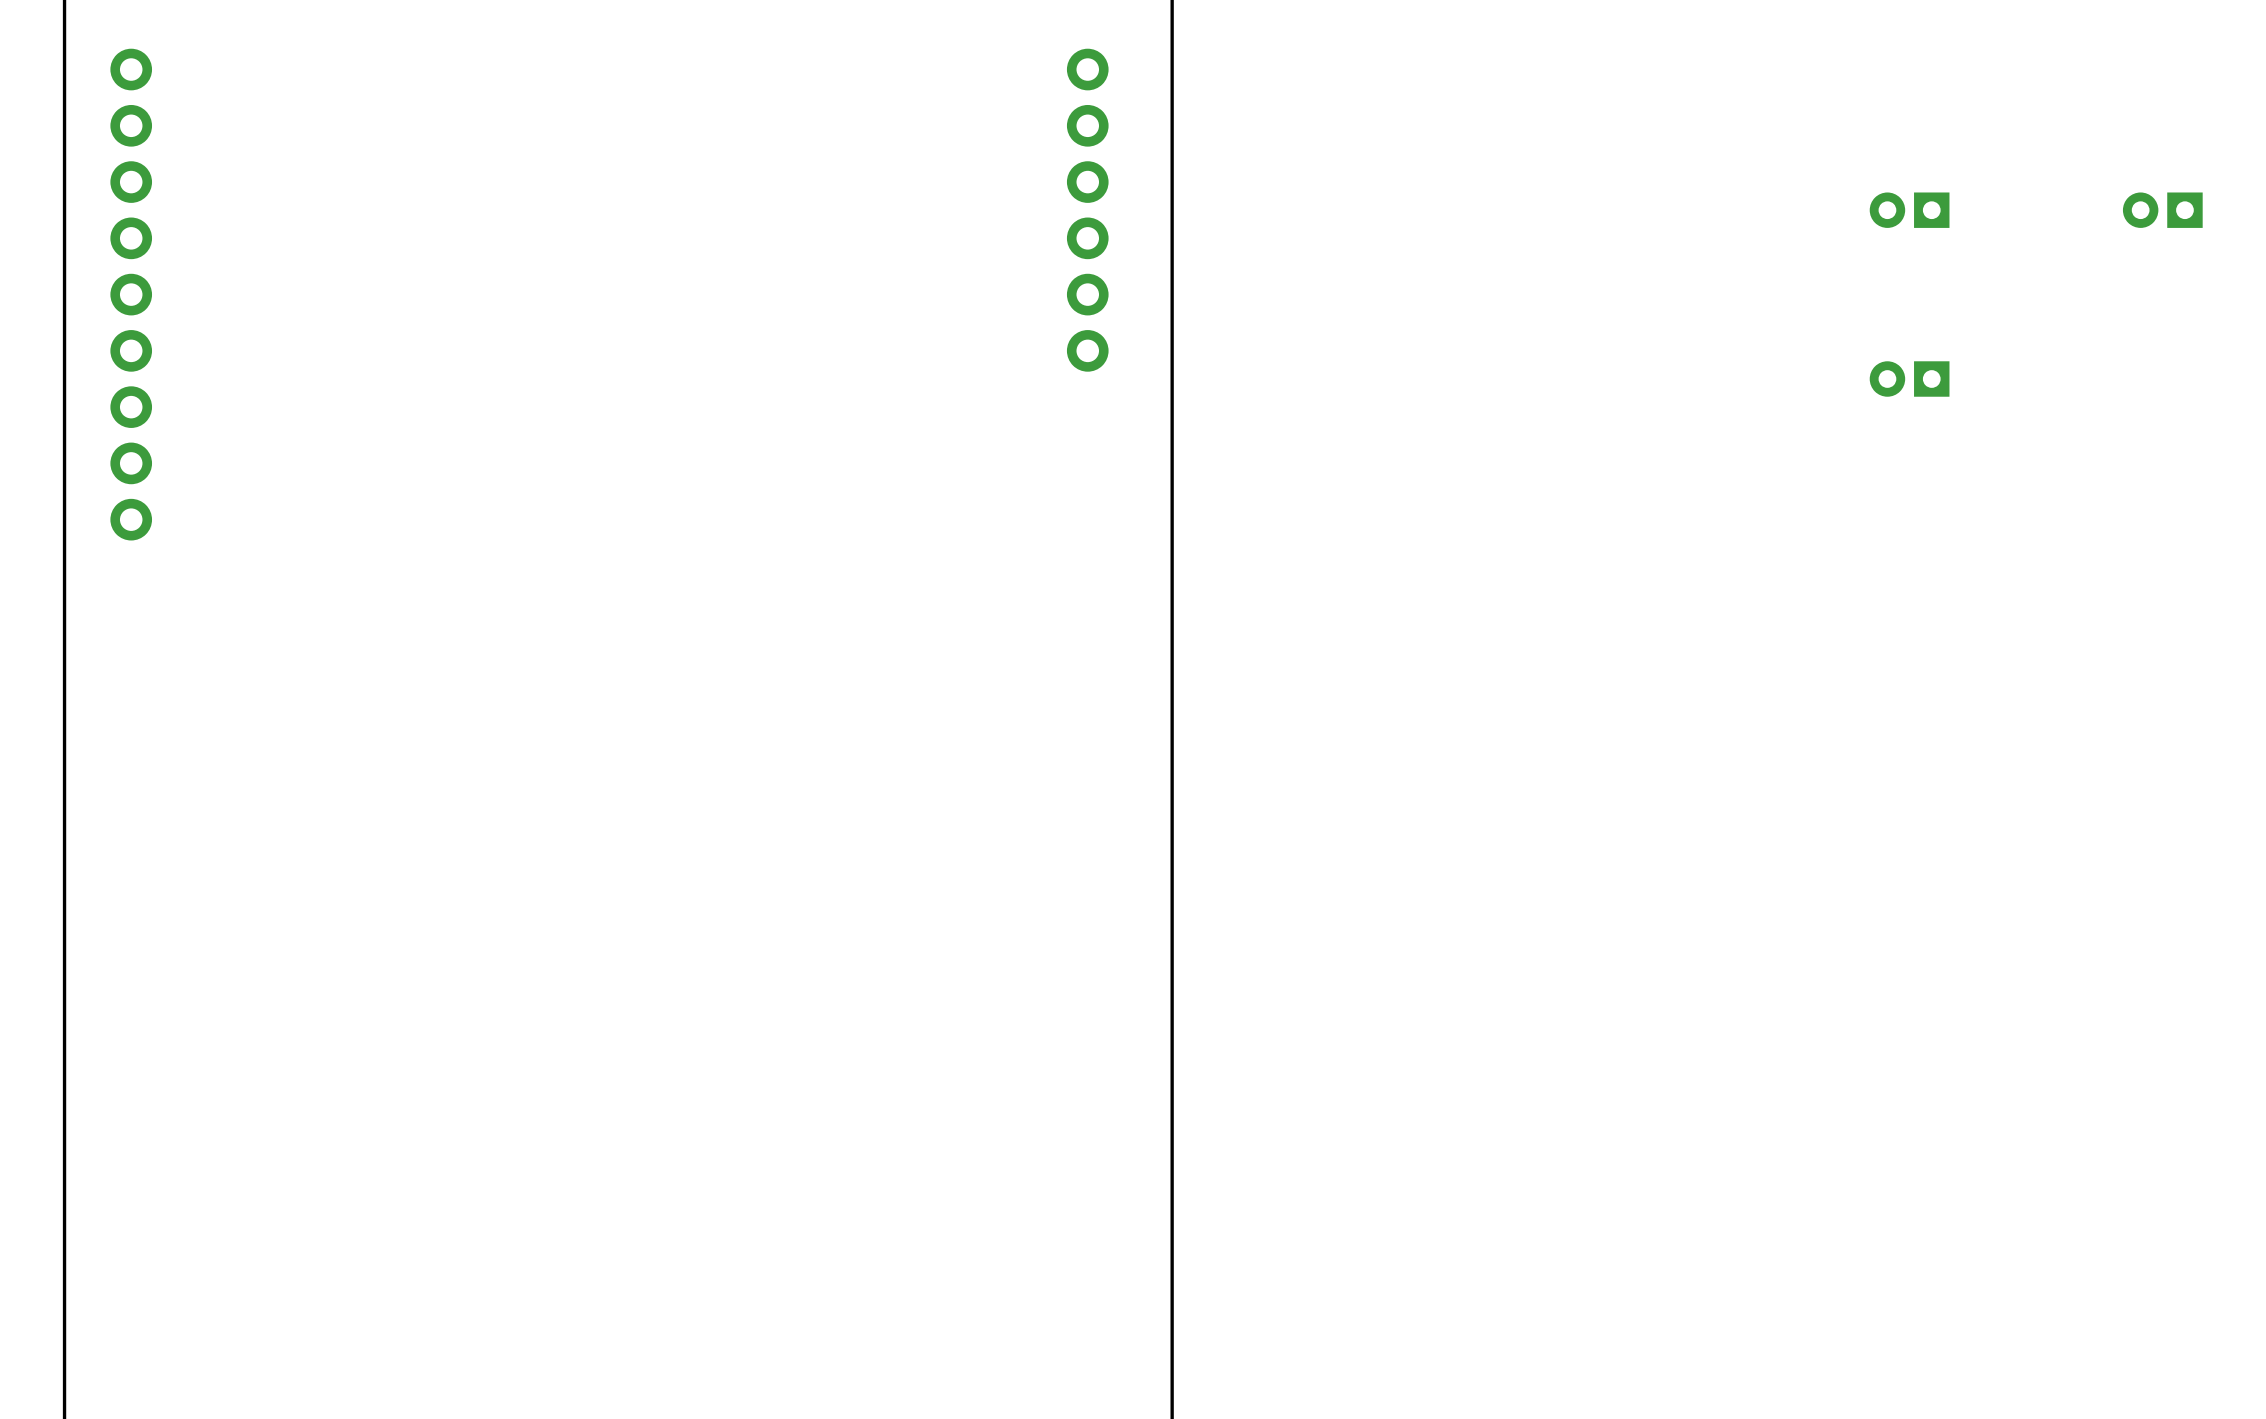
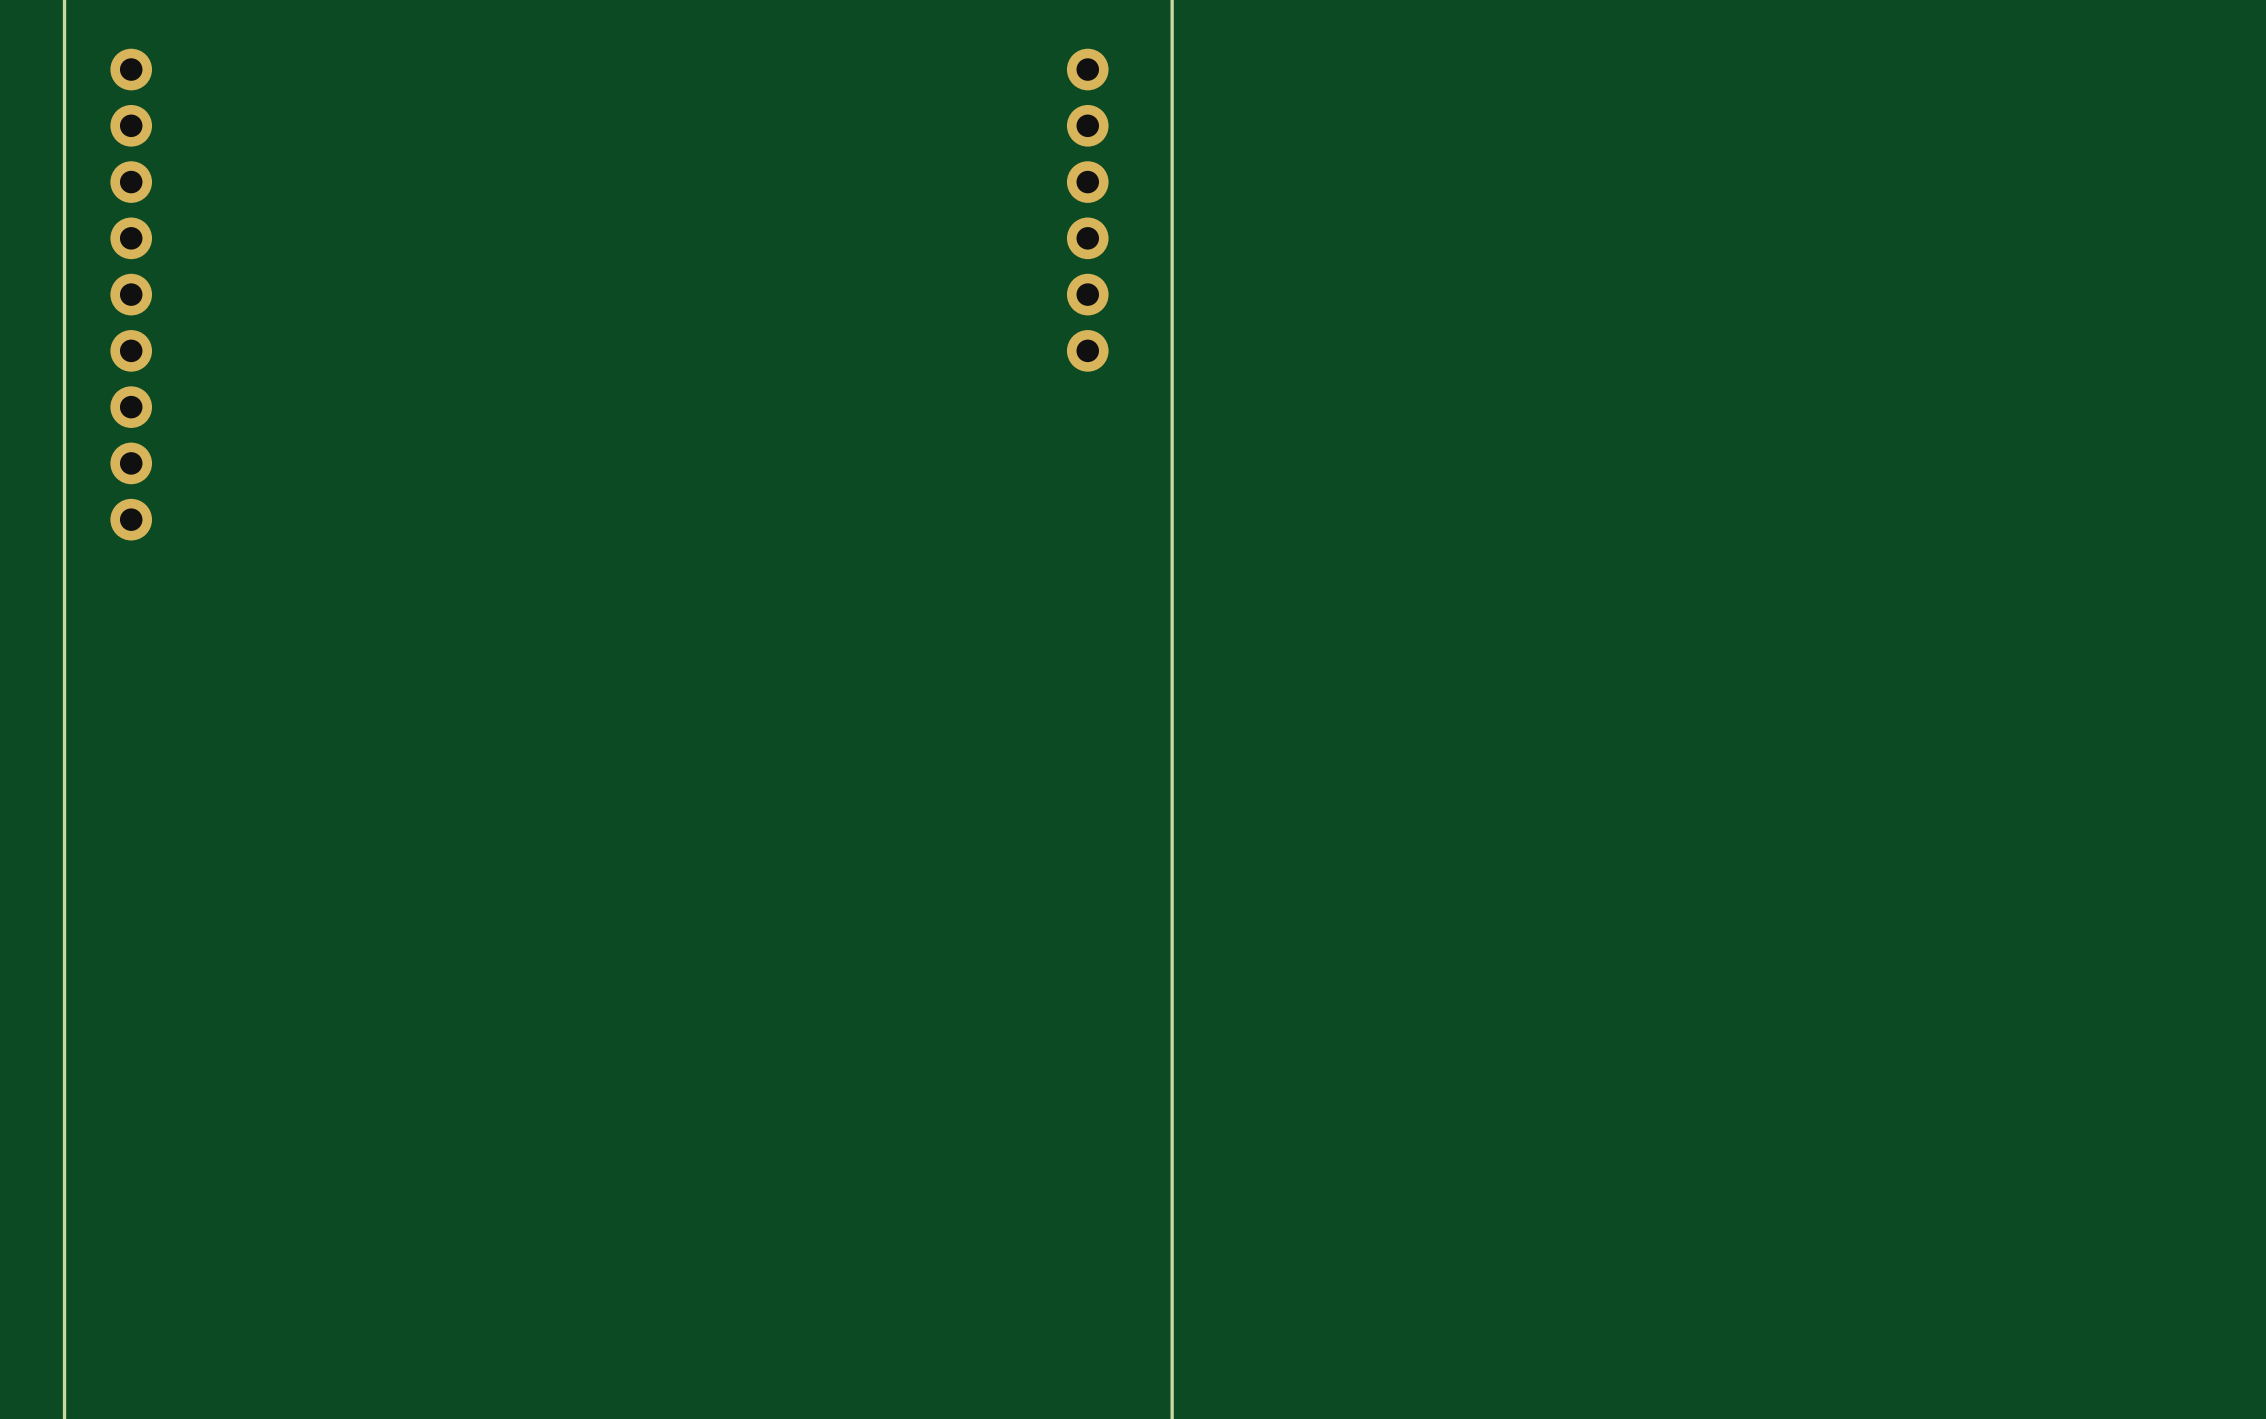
part: (1909, 210) -> none
part: (2162, 210) -> none
part: (1909, 379) -> none

